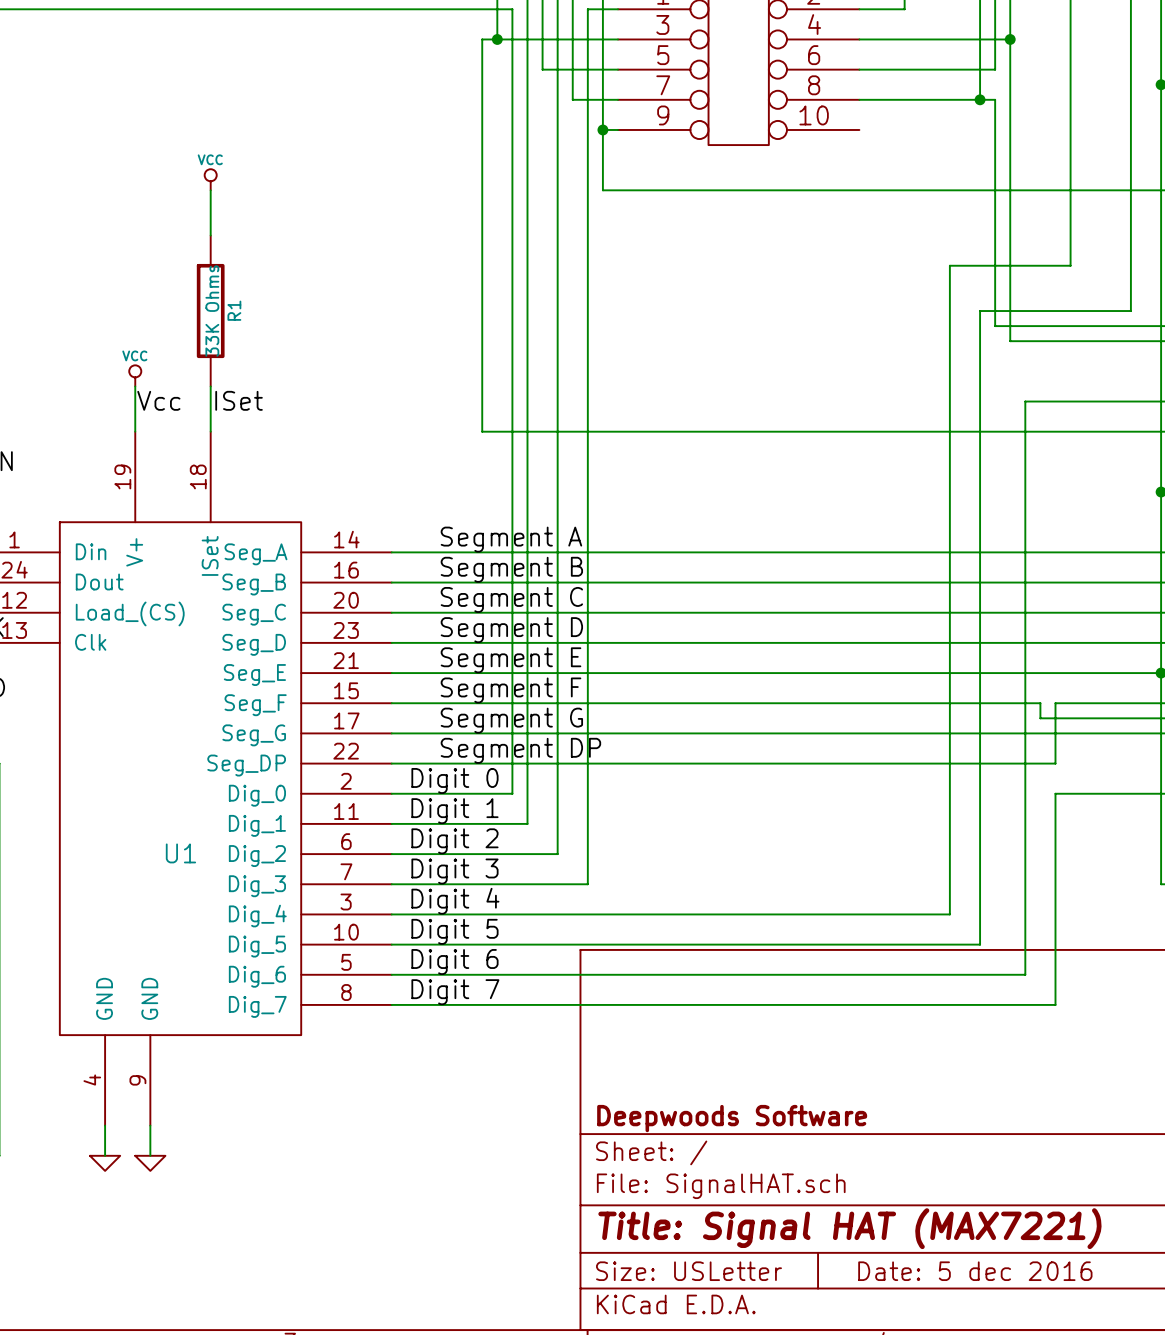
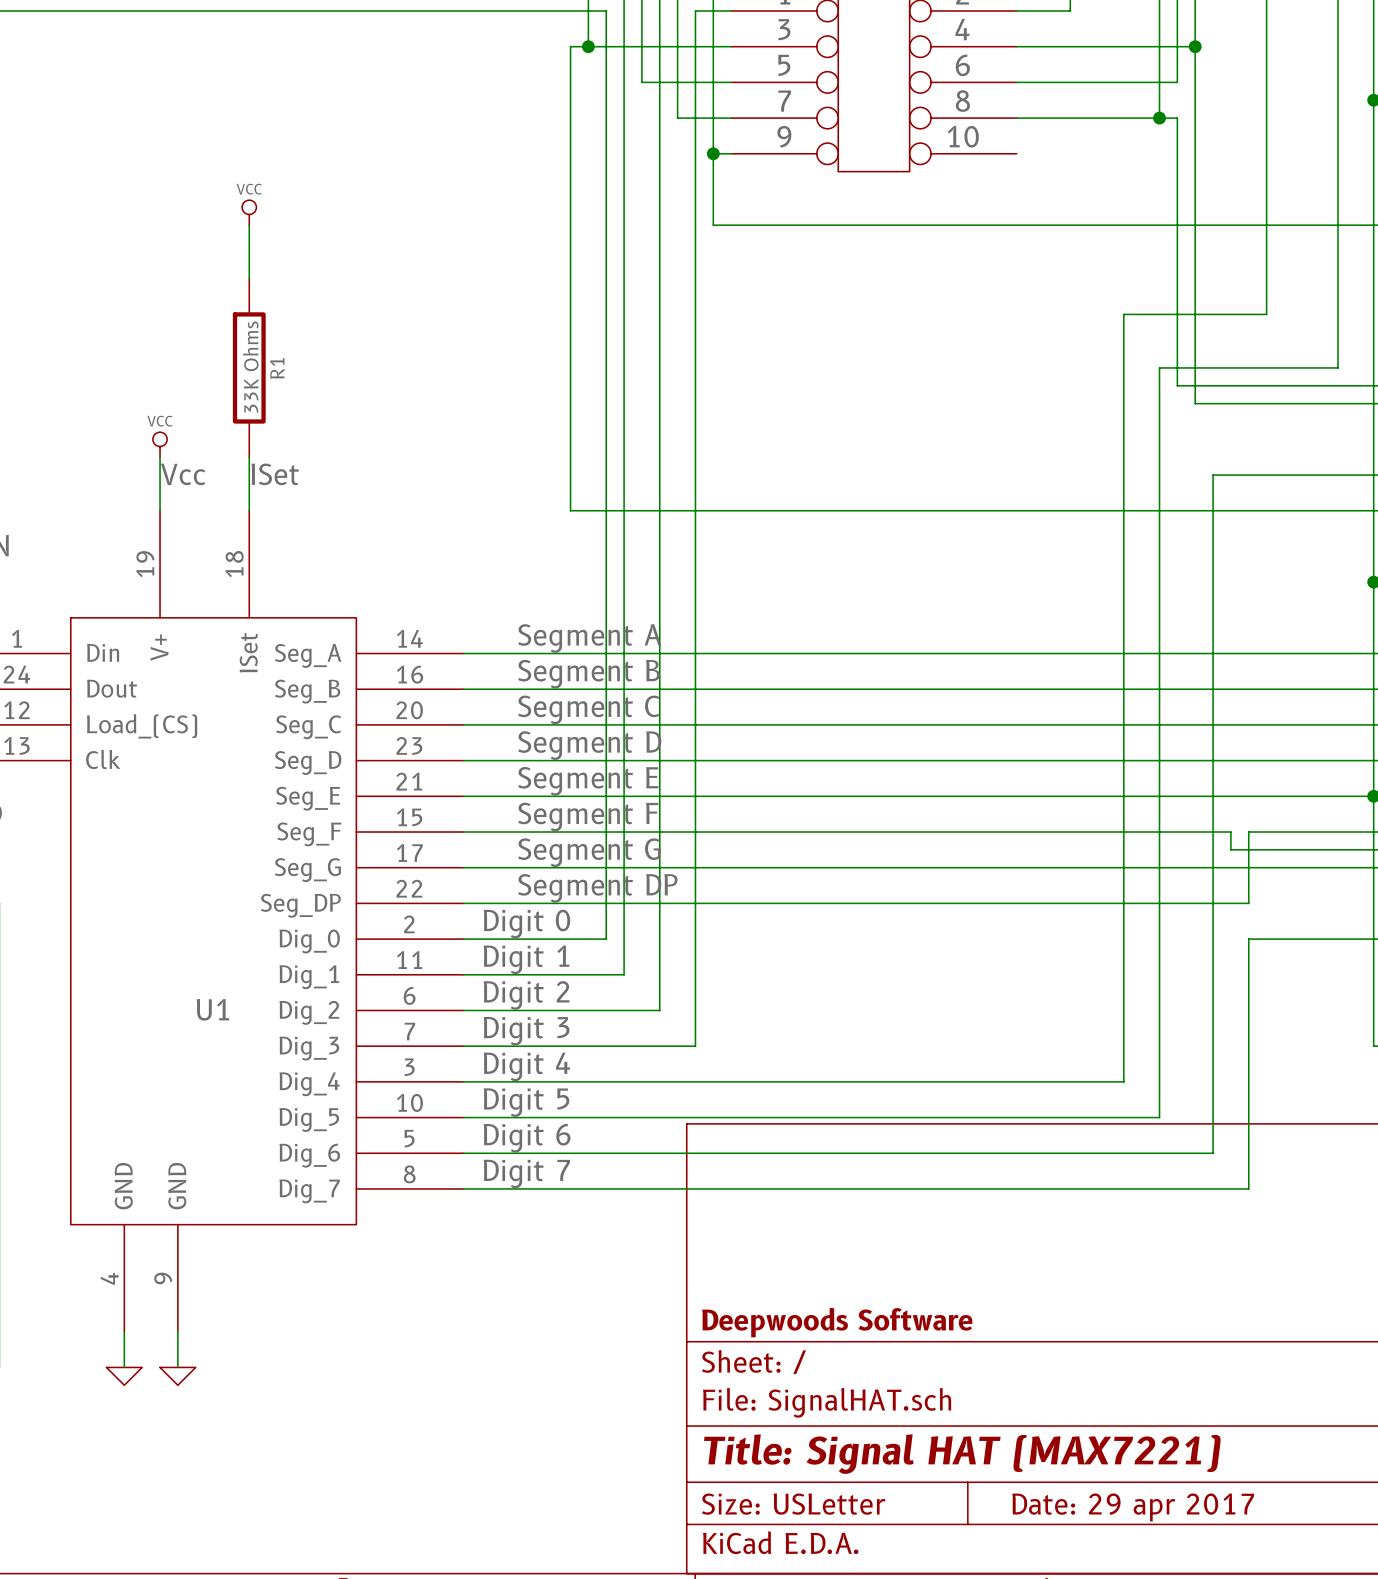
title block: Date: 5 dec 2016 (975, 1271) -> Date: 29 apr 2017 (1133, 1507)

